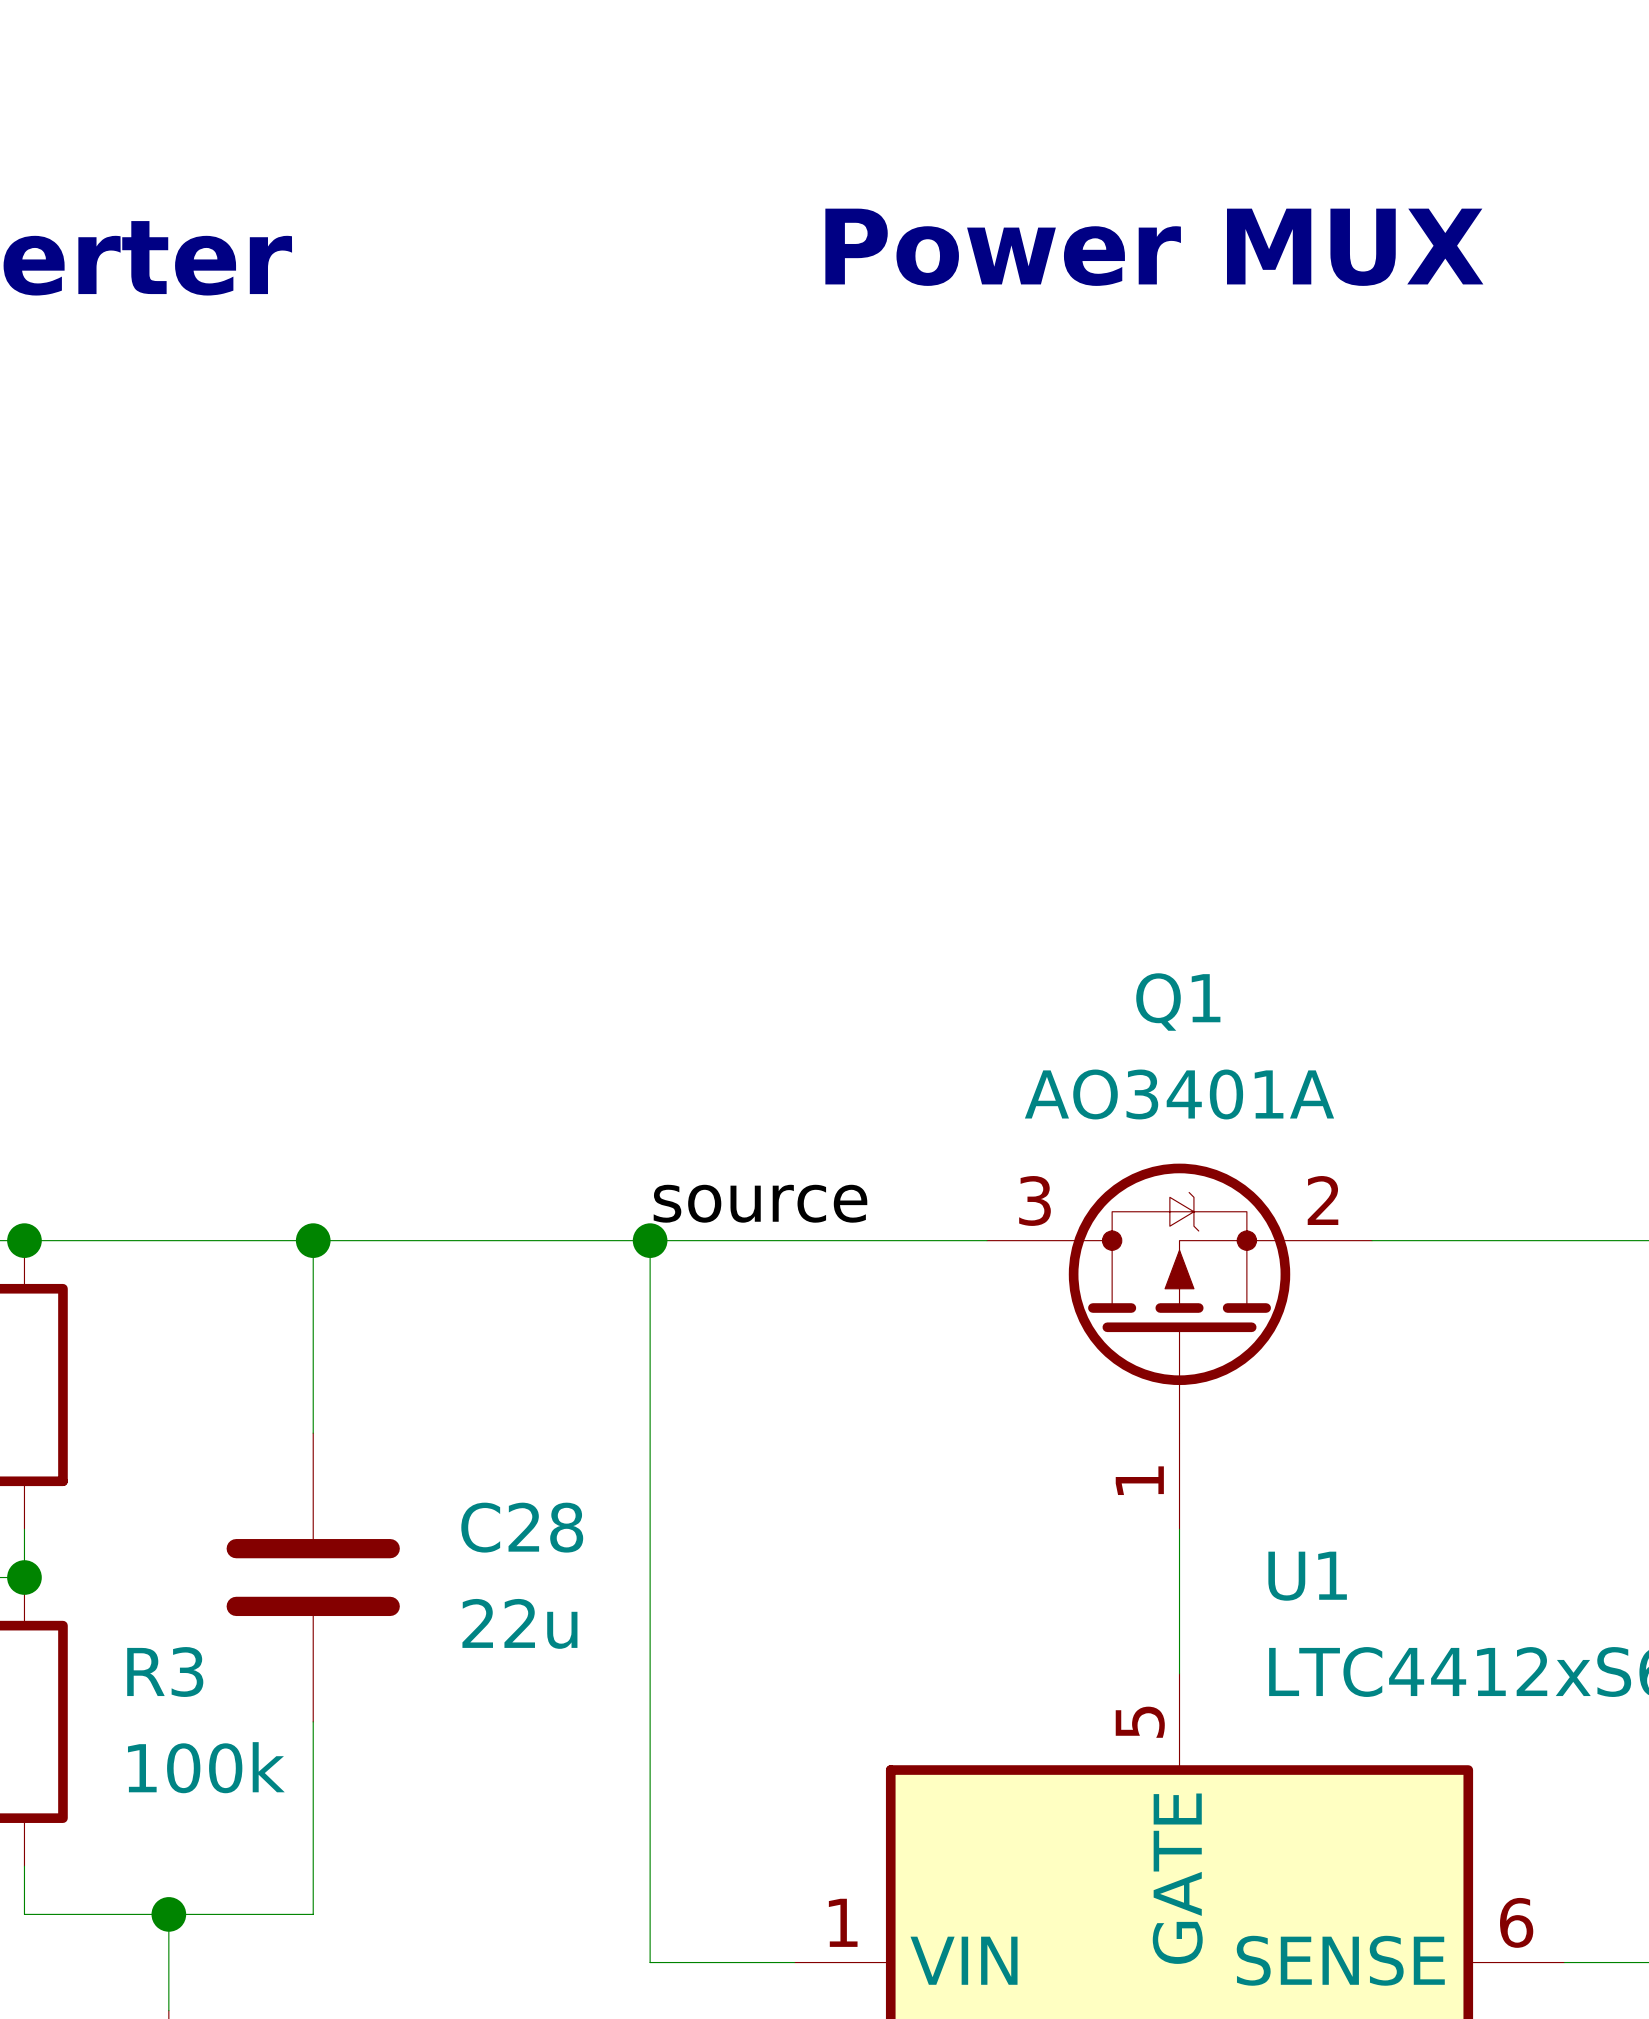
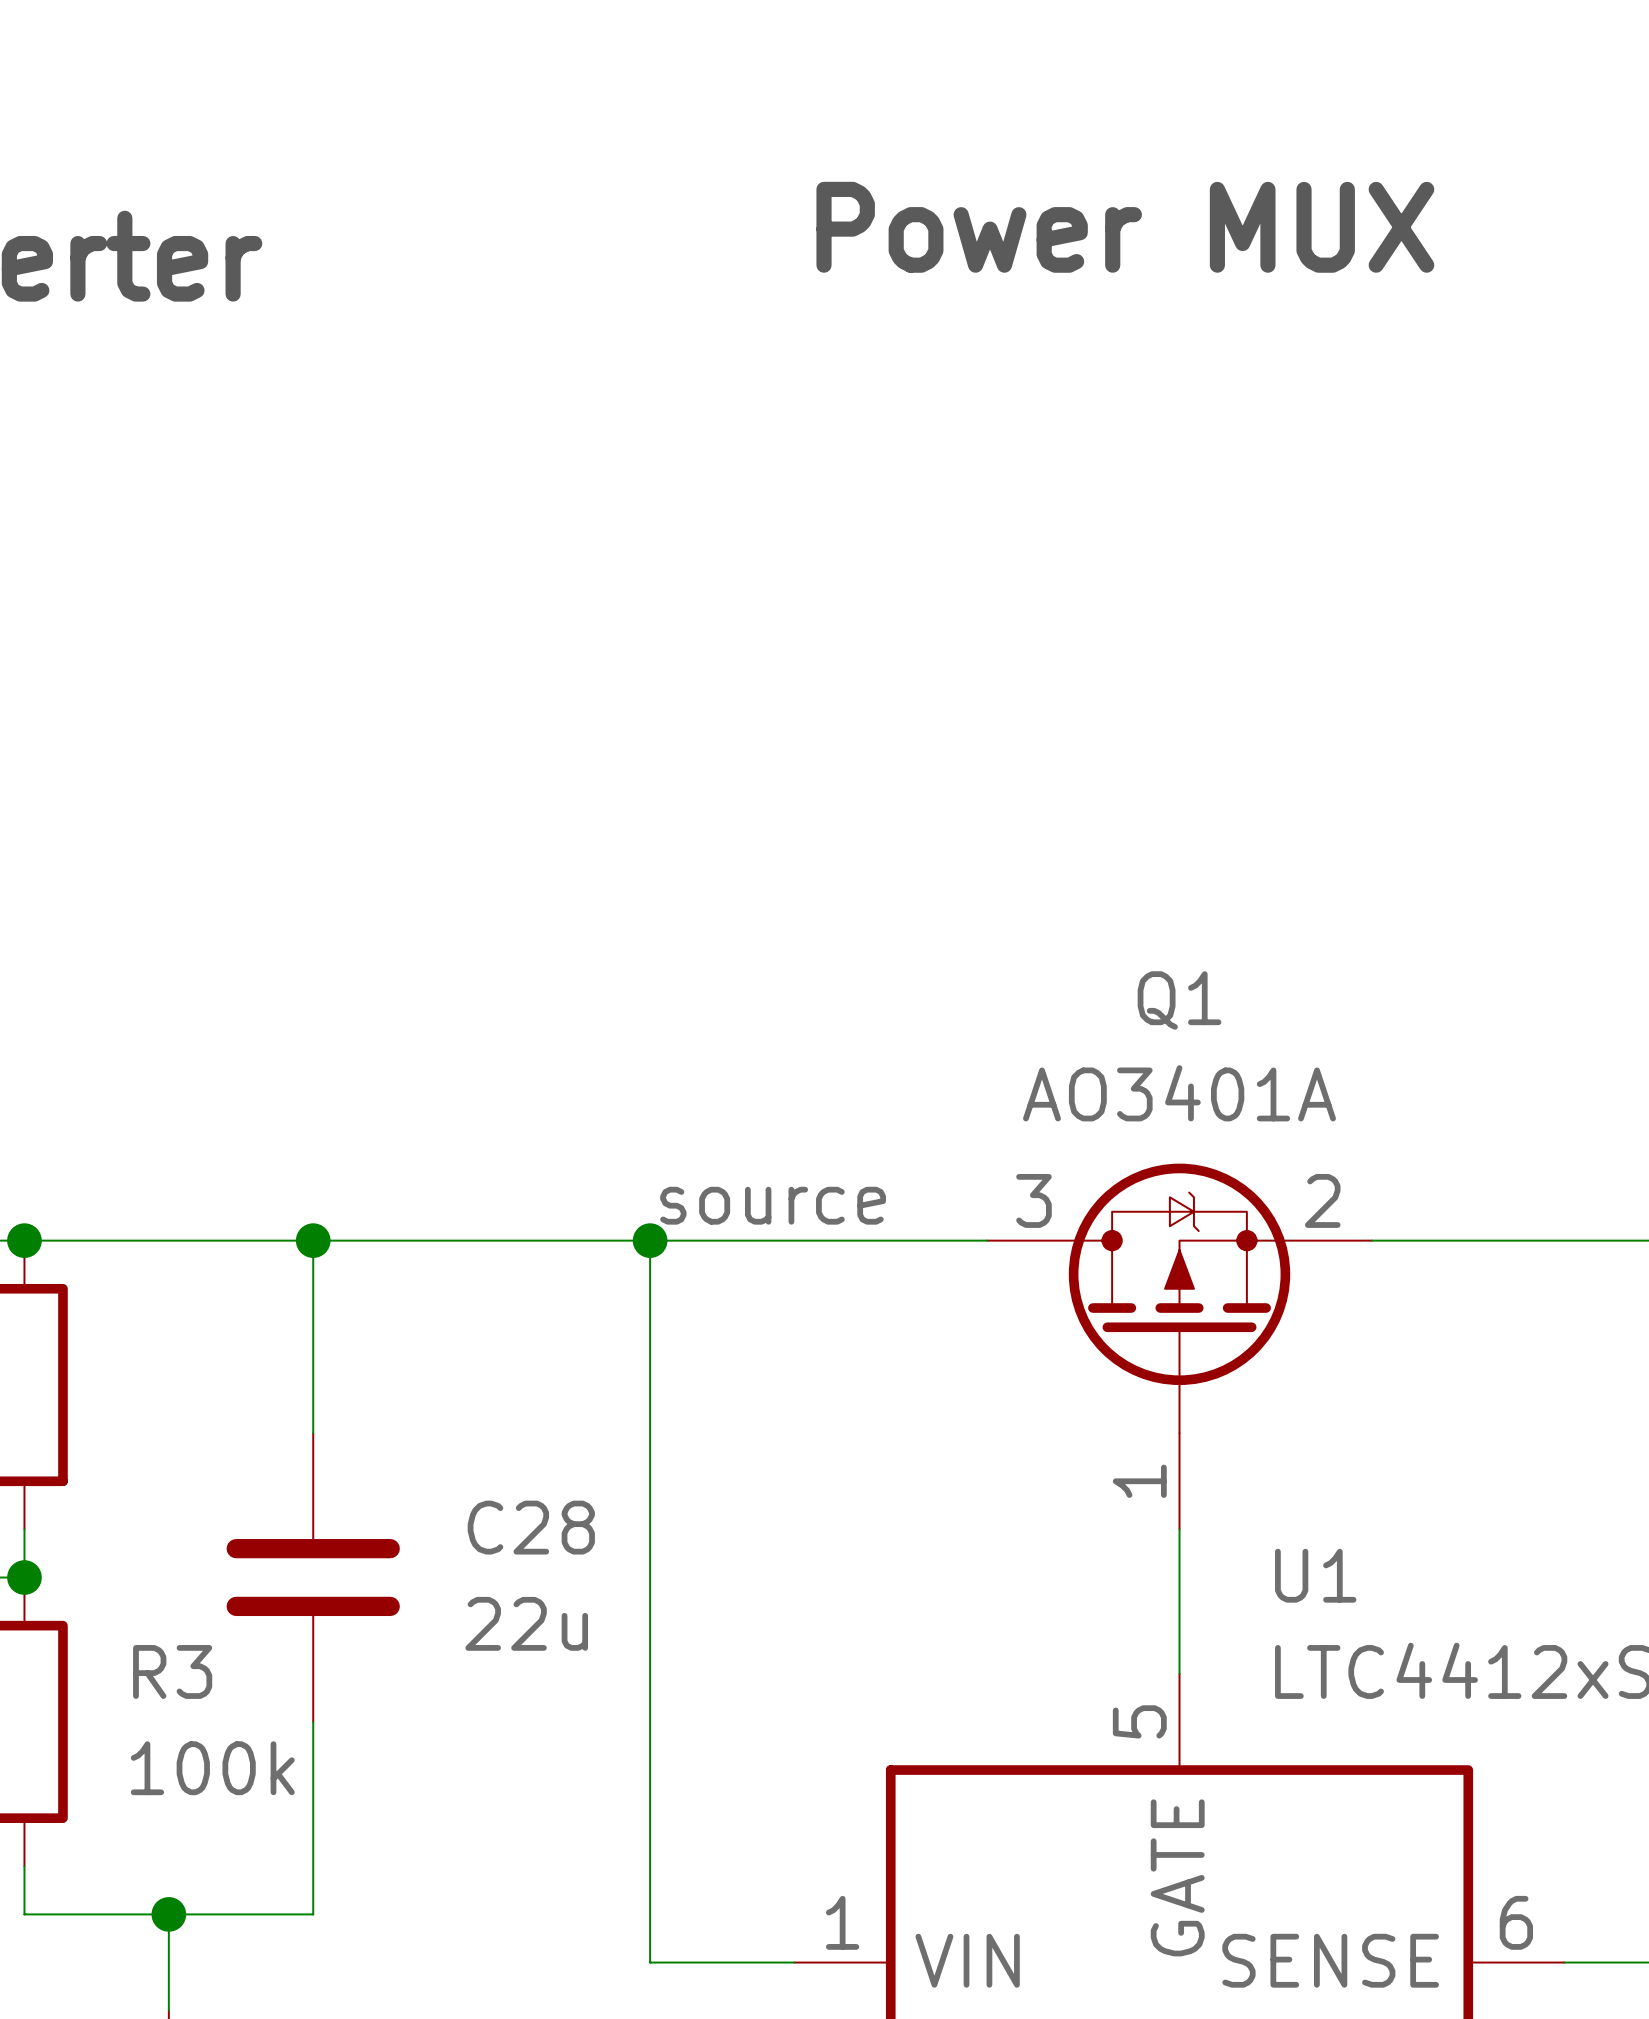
text position: Power MUX (1154, 247) -> Power MUX (1125, 227)

